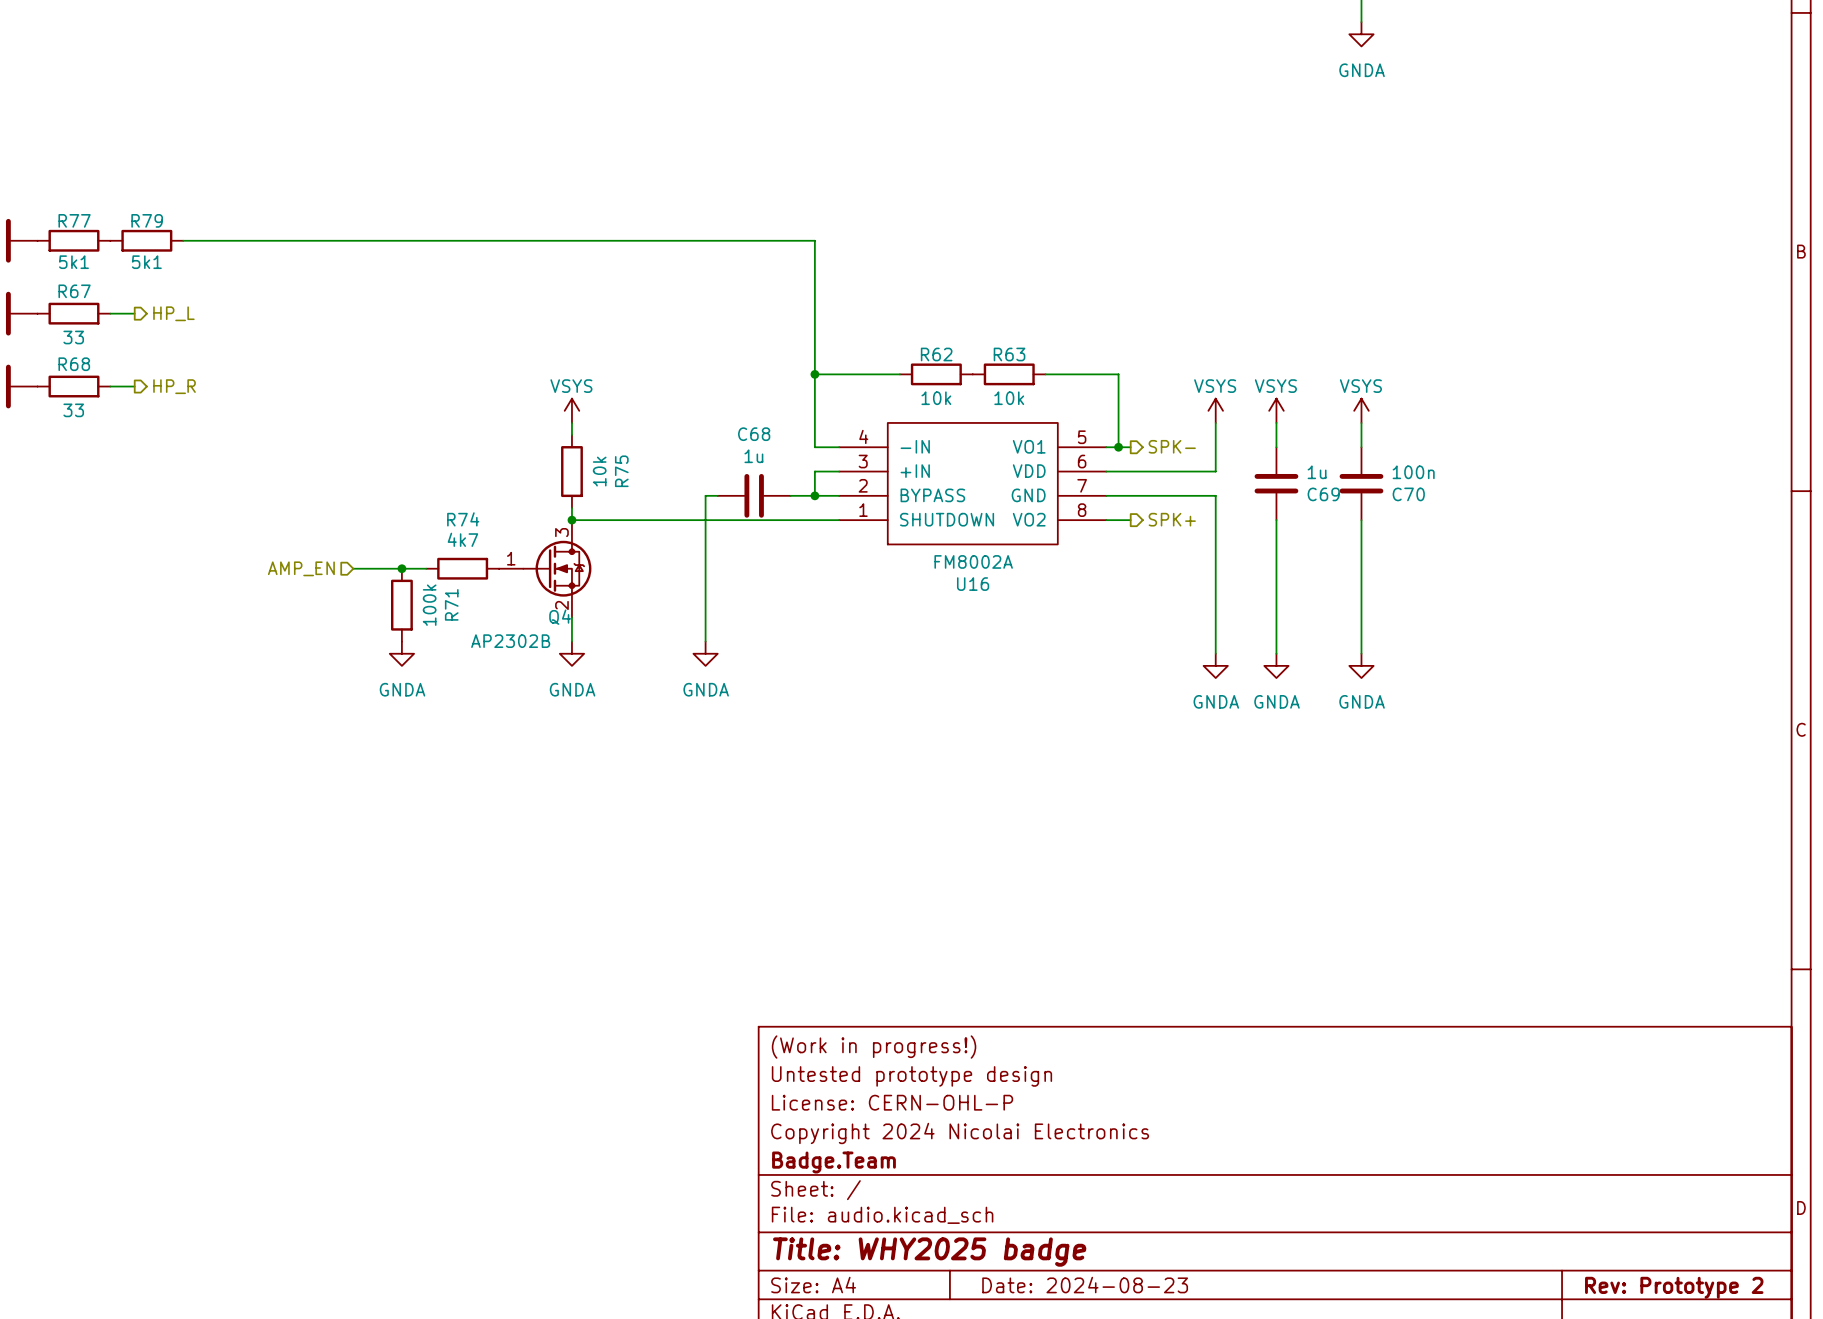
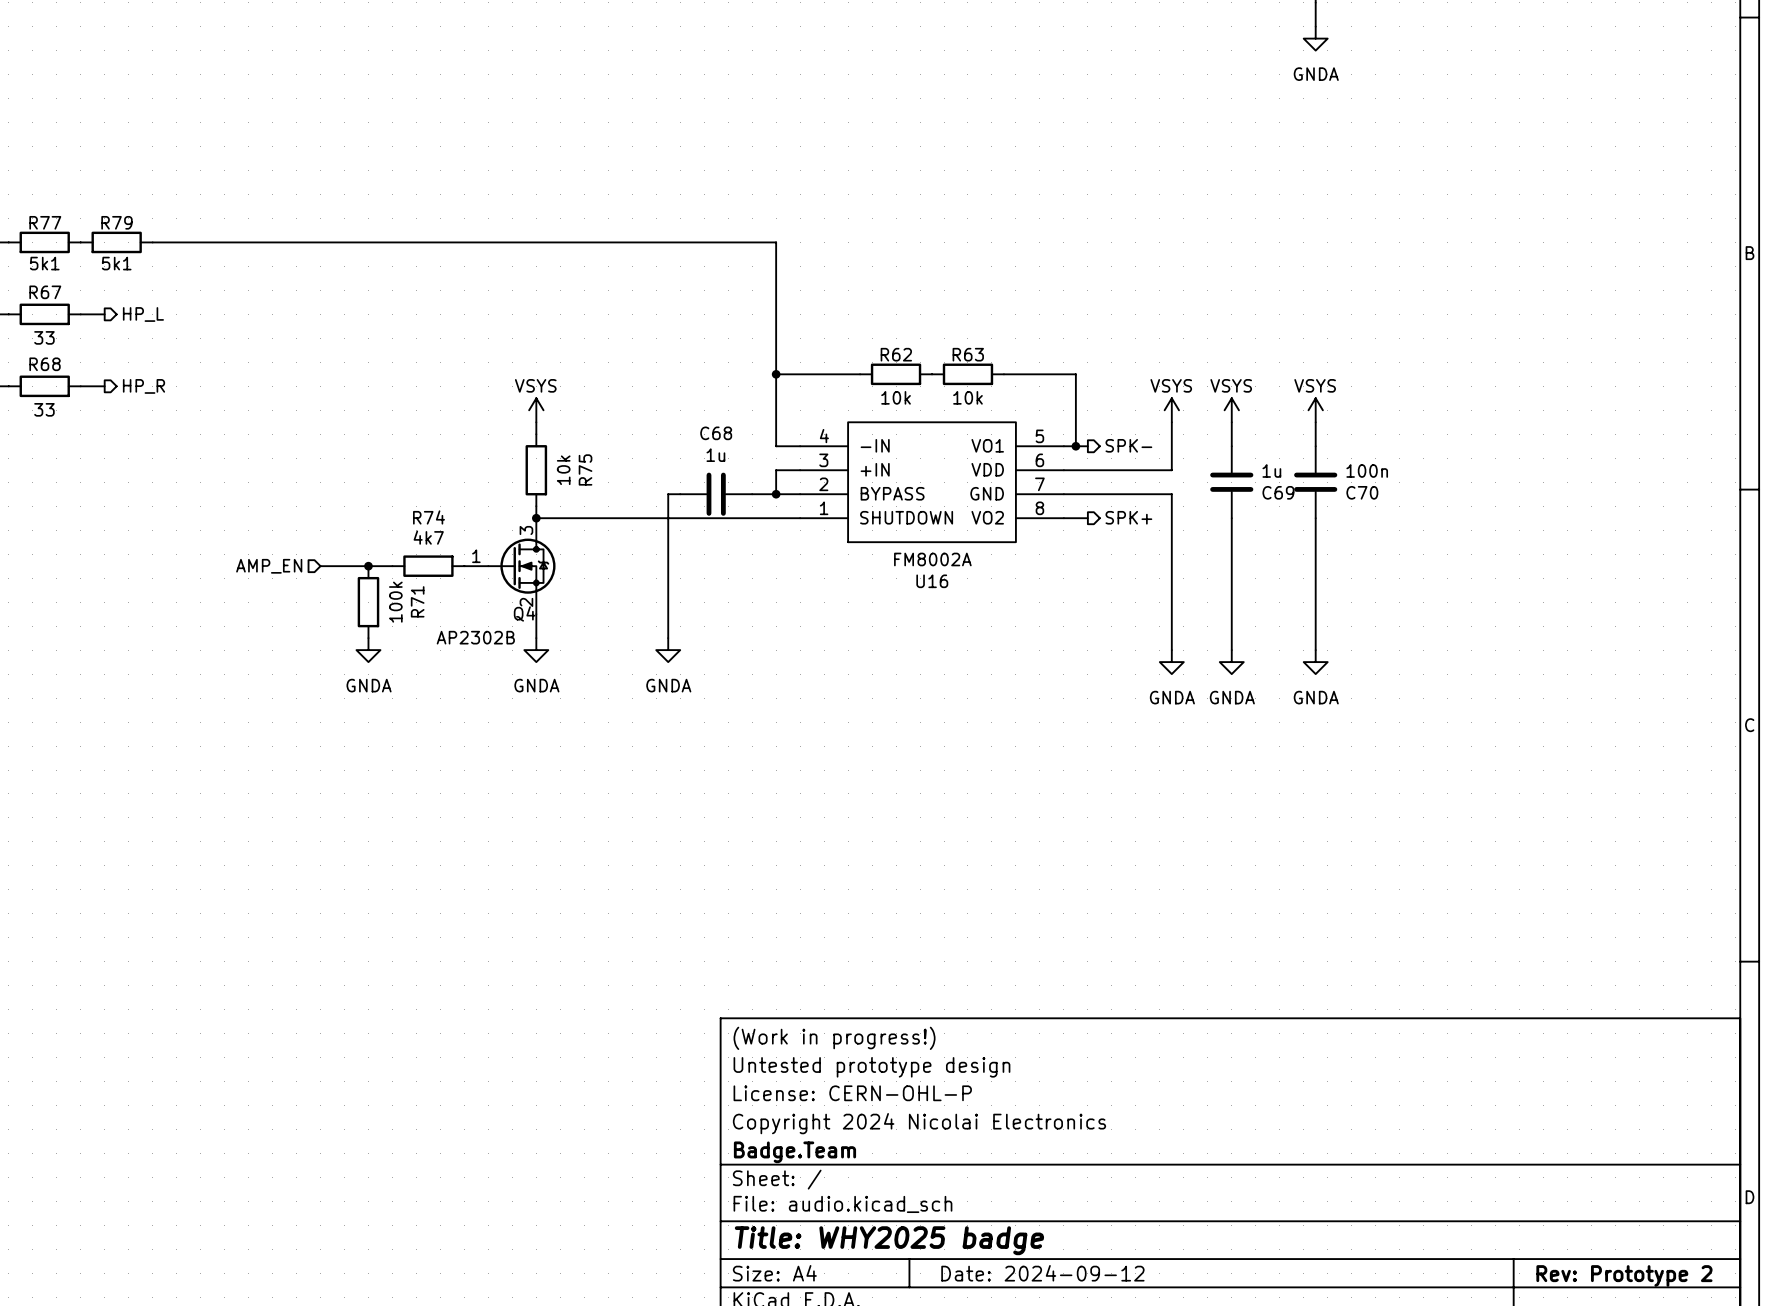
title block: Date: 2024-08-23 (1085, 1285) -> Date: 2024-09-12 (1042, 1273)

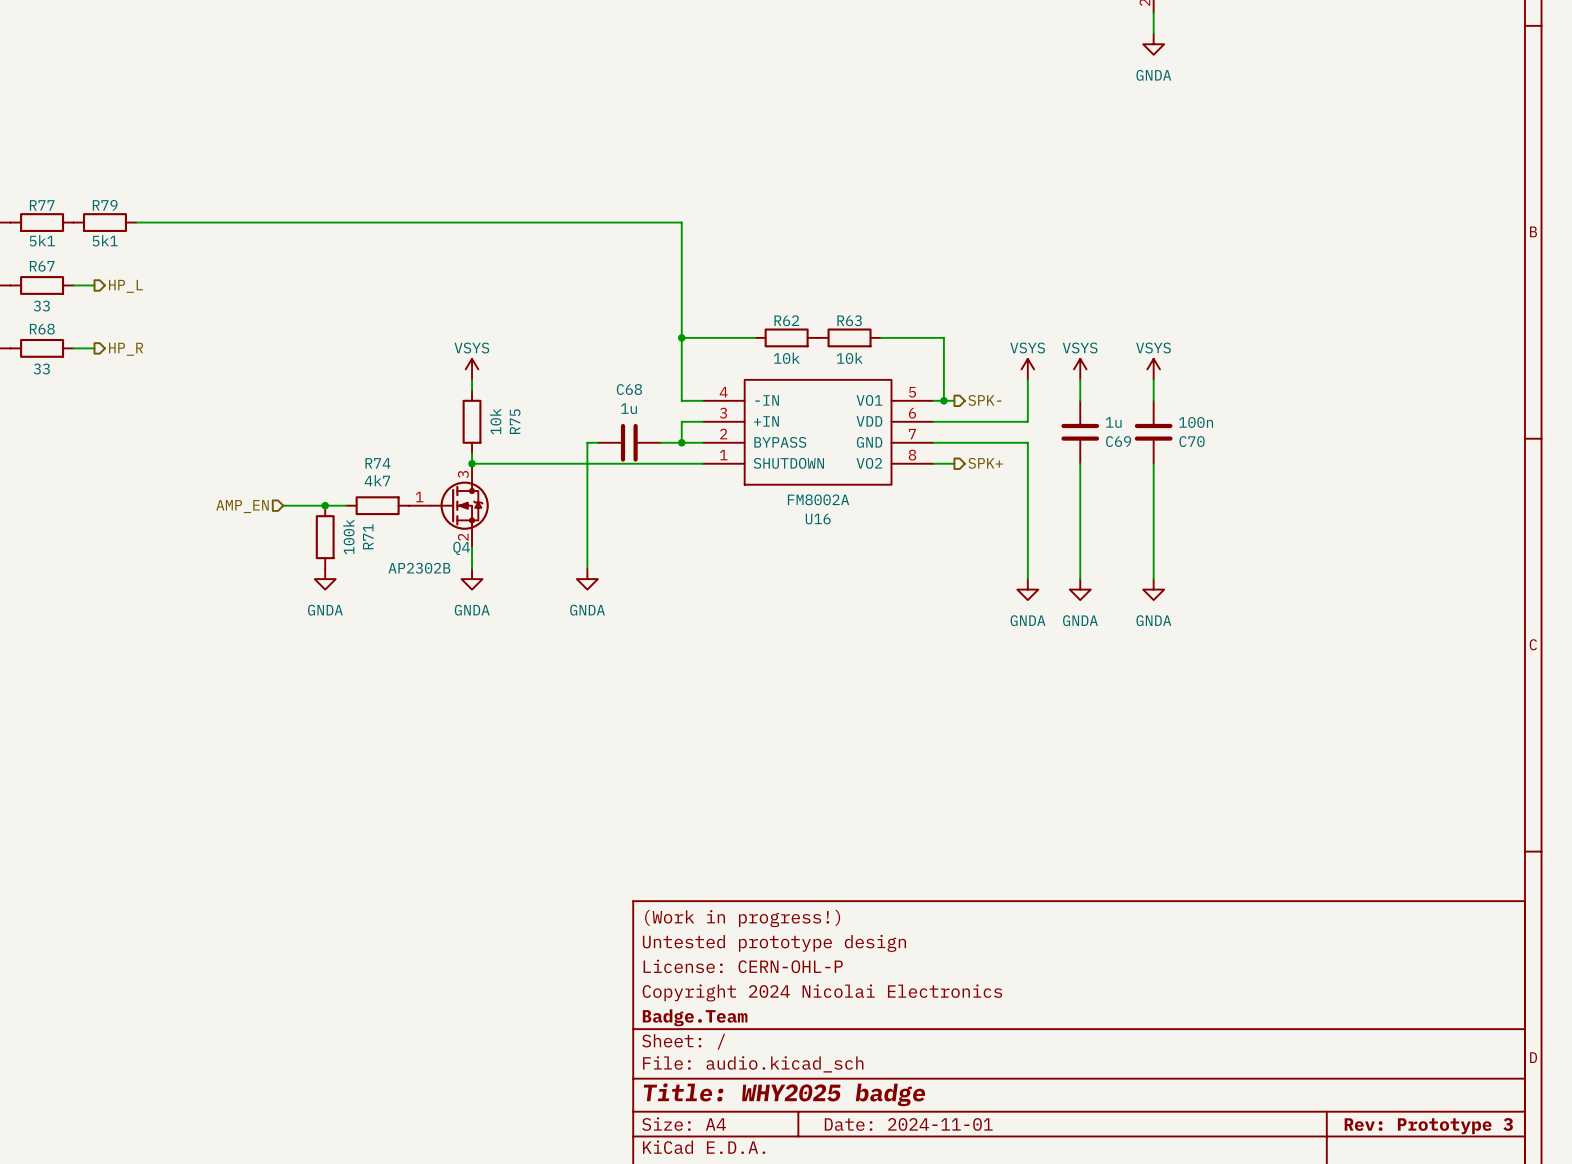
title block: Date: 2024-09-12 (1042, 1273) -> Date: 2024-11-01 (908, 1124)
title block: Rev: Prototype 2 (1624, 1275) -> Rev: Prototype 3 (1428, 1126)

